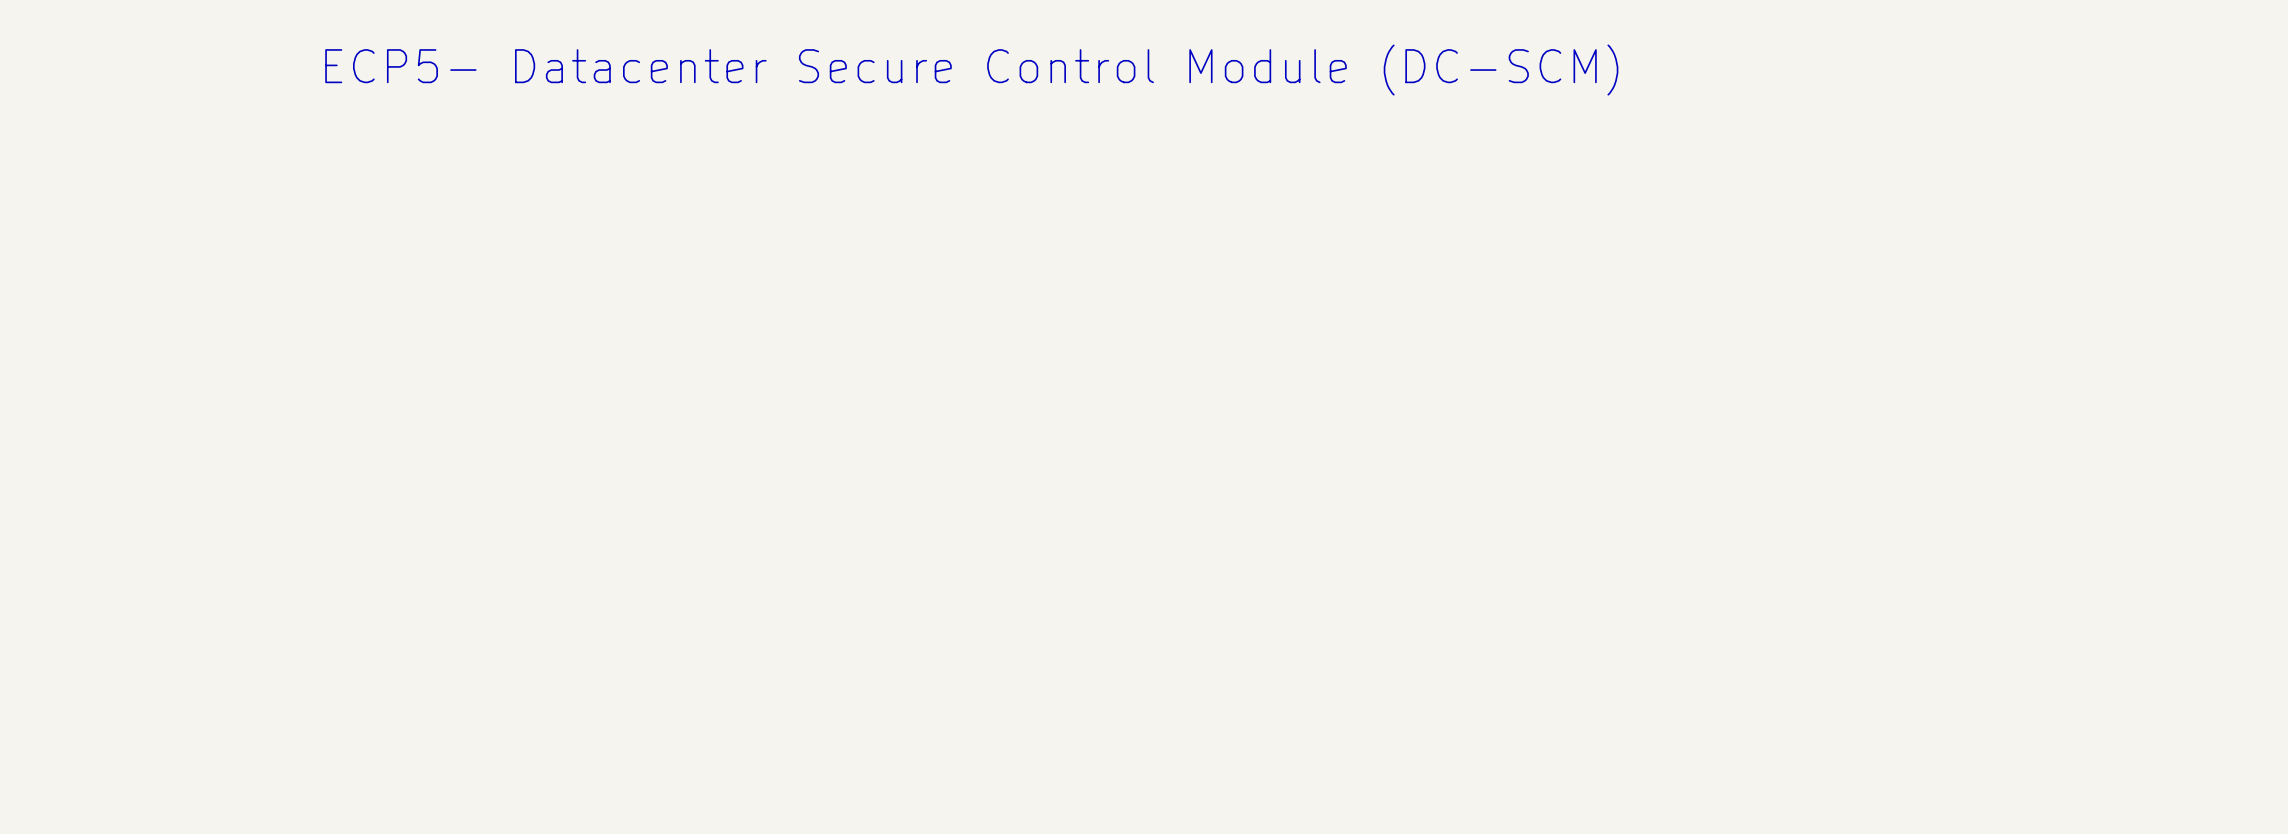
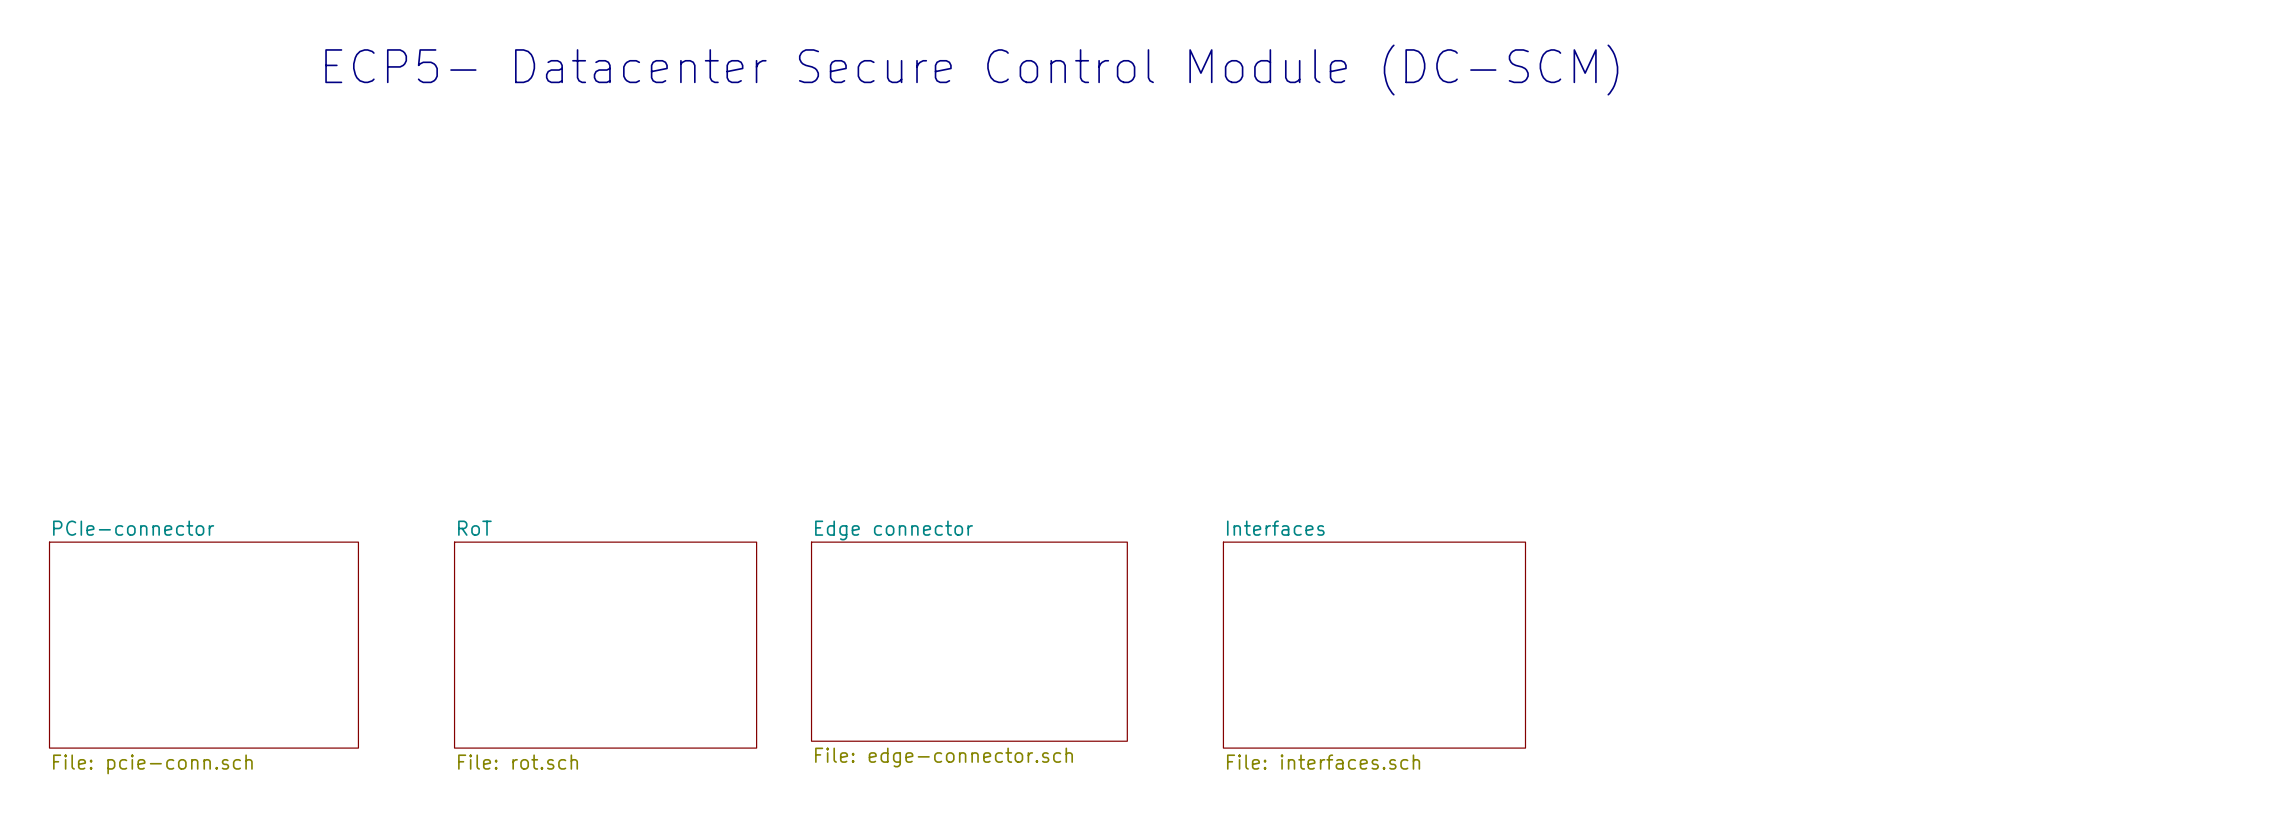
sheet Edge connector: none -> File: edge-connector.sch (969, 641)
sheet PCIe-connector: none -> File: pcie-conn.sch (203, 645)
sheet RoT: none -> File: rot.sch (605, 645)
sheet Interfaces: none -> File: interfaces.sch (1374, 645)

